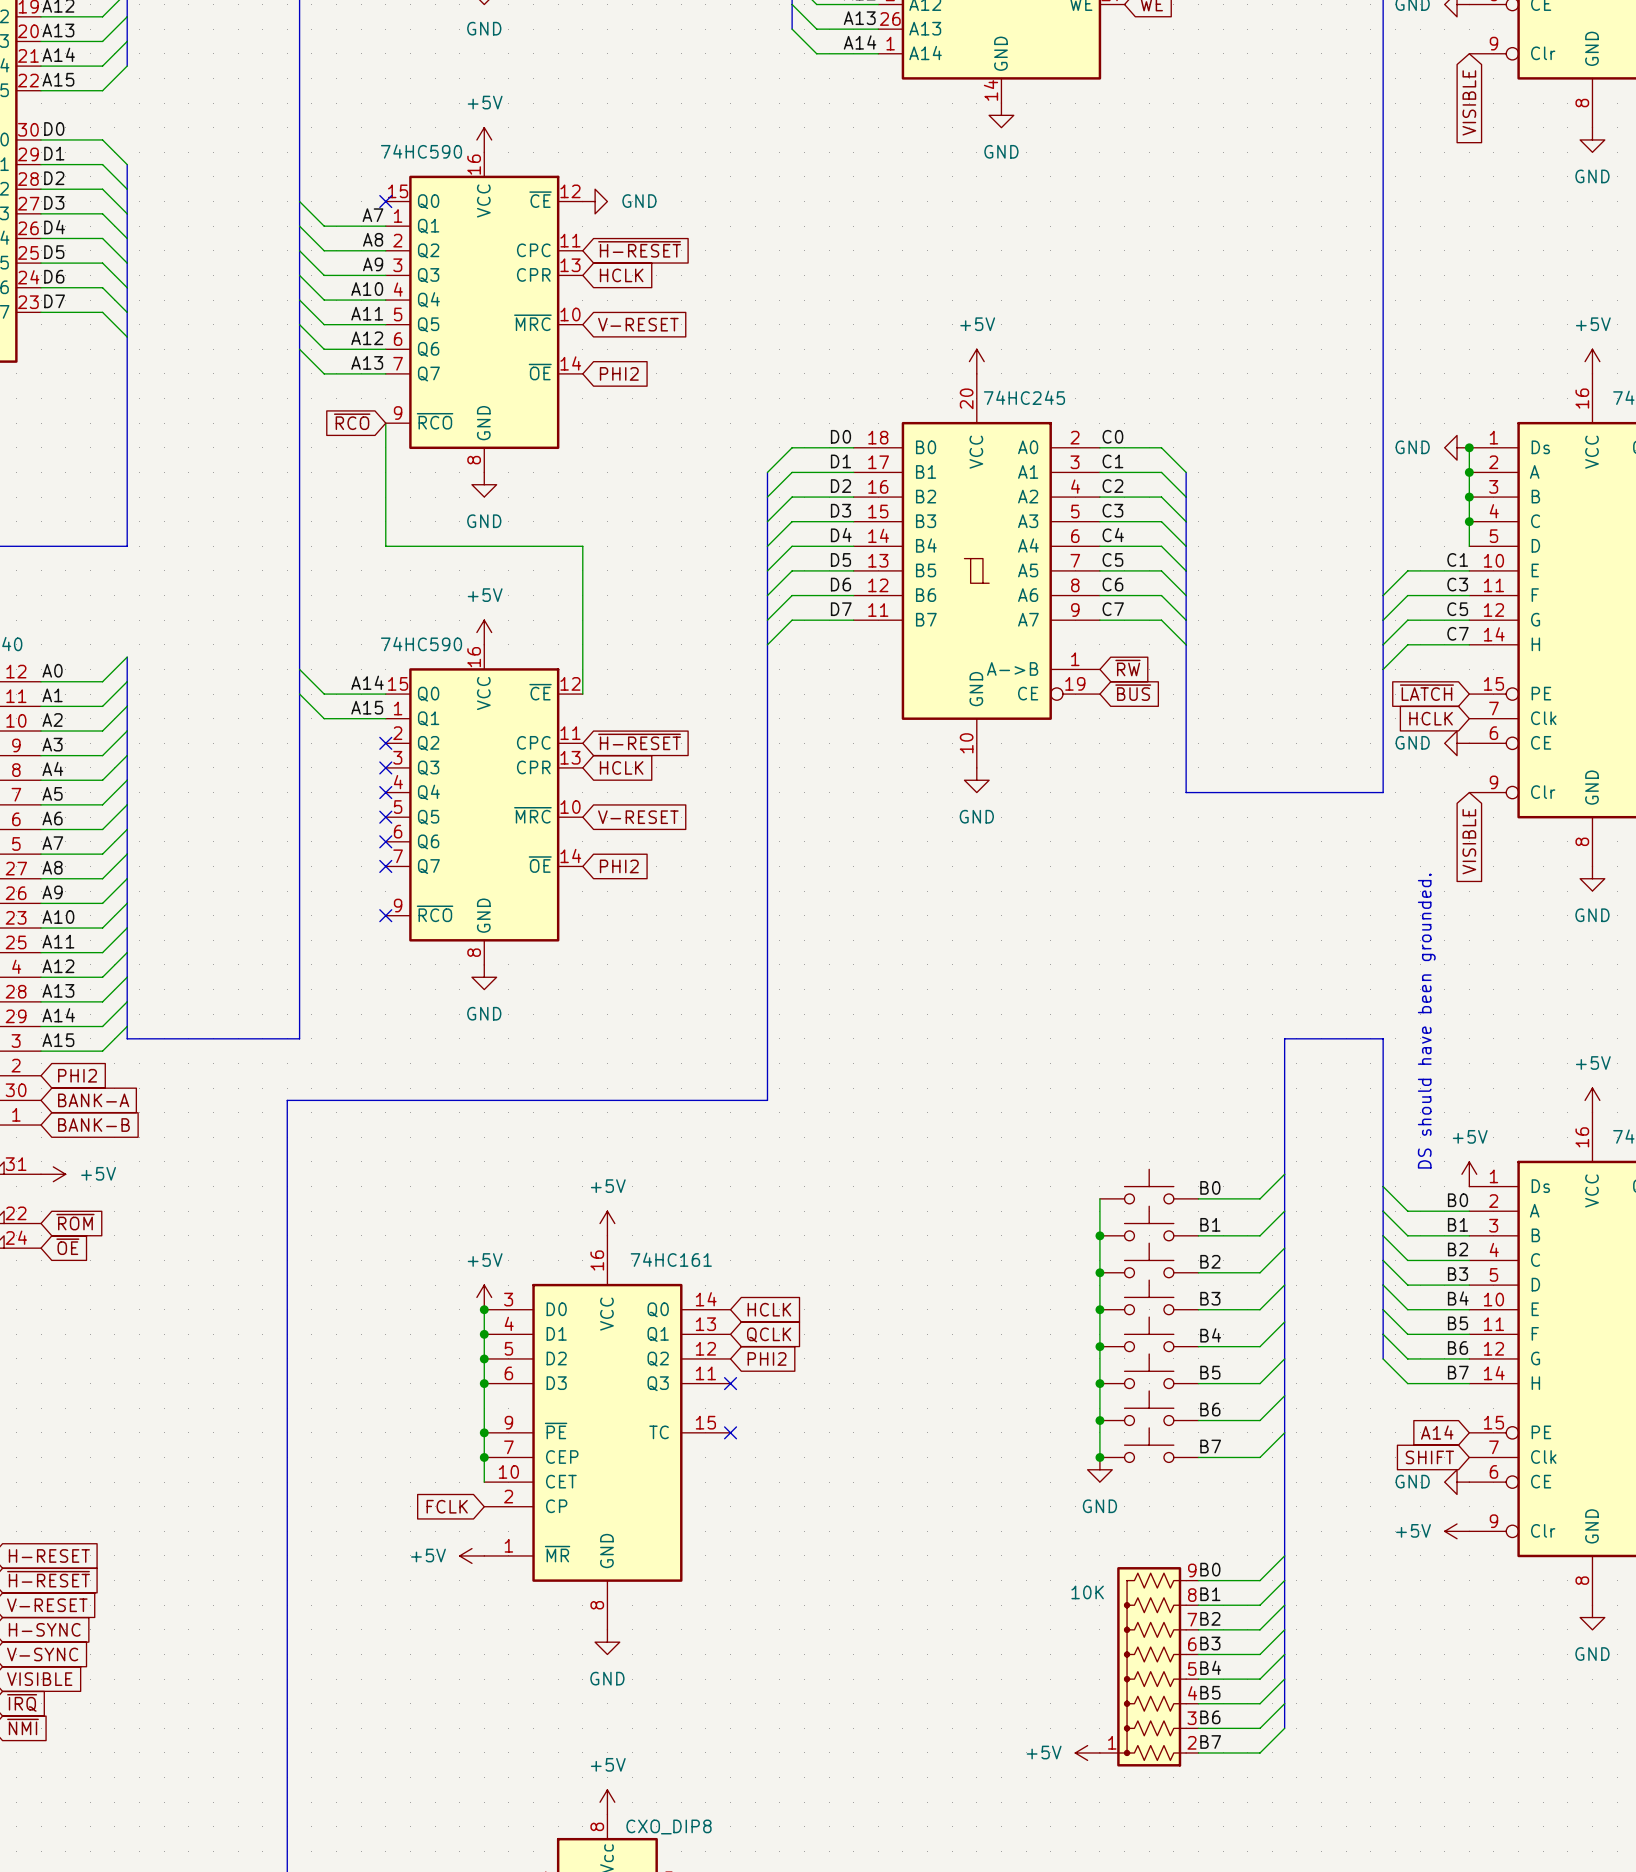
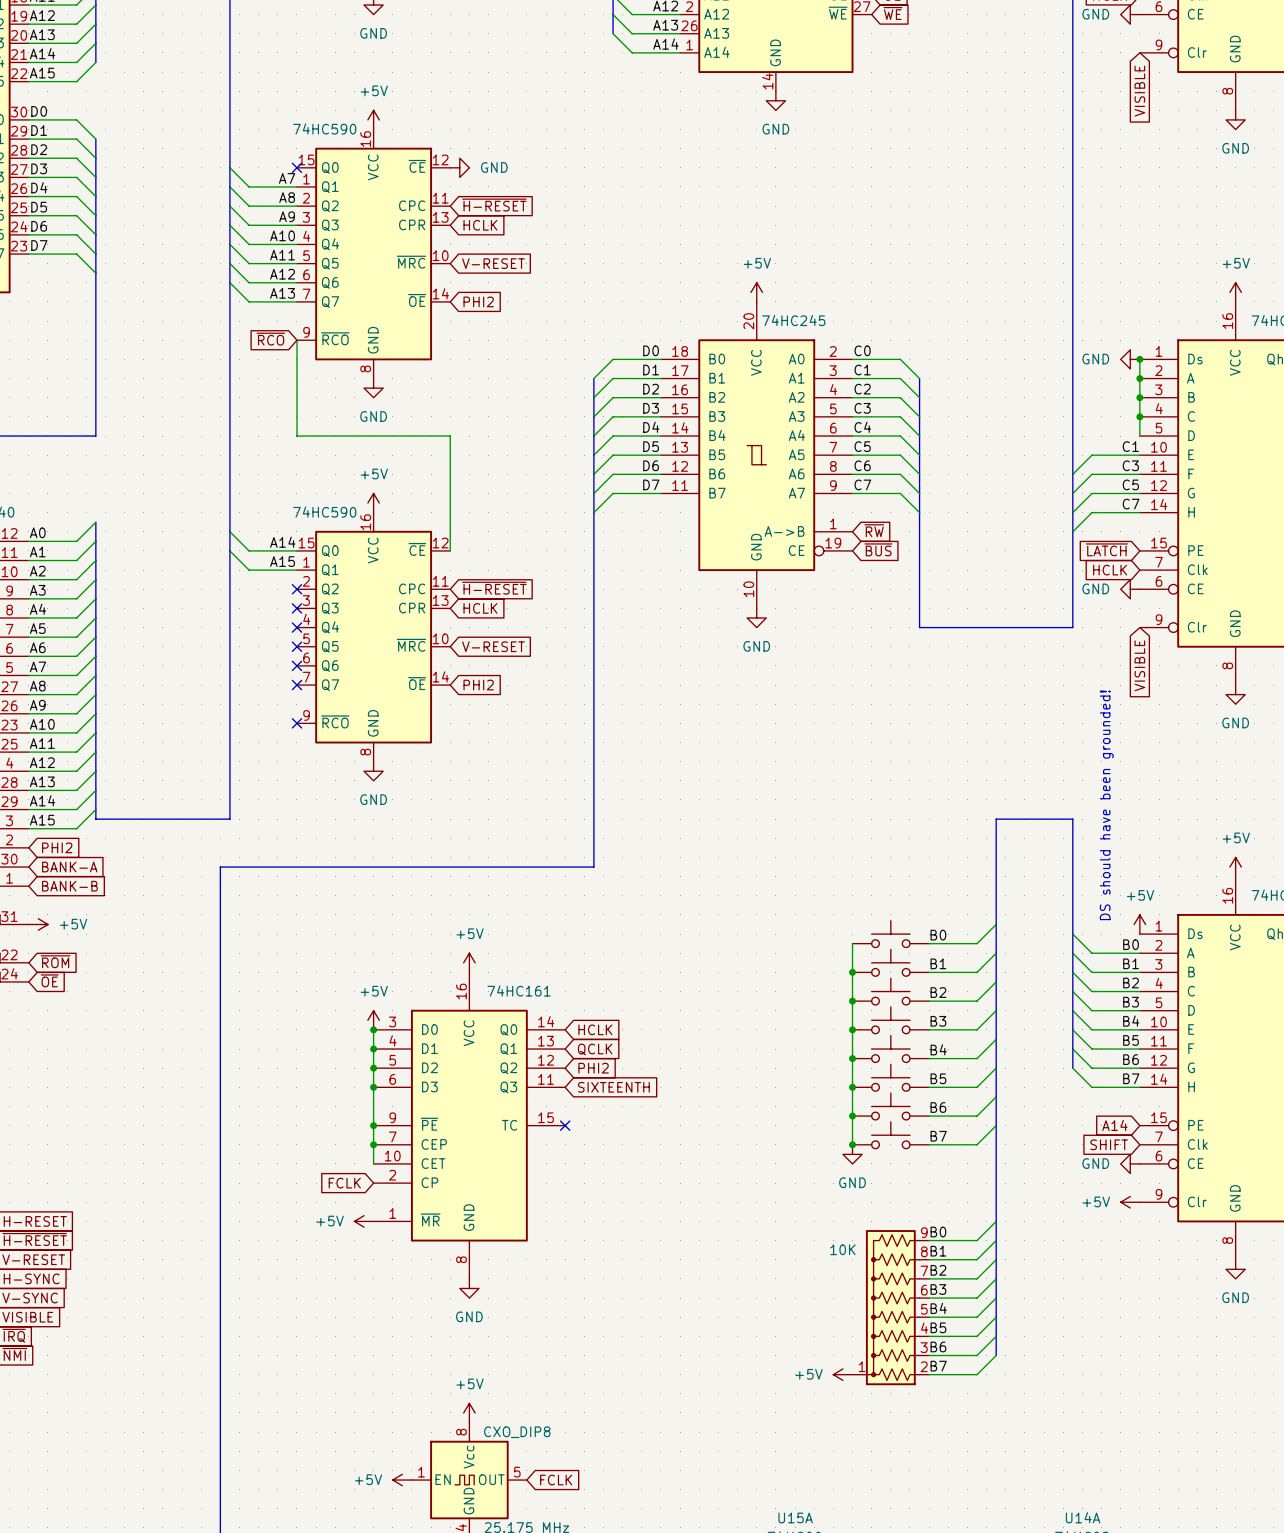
text: DS should have been grounded. (1426, 1021) -> DS should have been grounded! (1106, 805)
no-connect mark: (730, 1383) -> none
global label: none -> SIXTEENTH (613, 1087)

